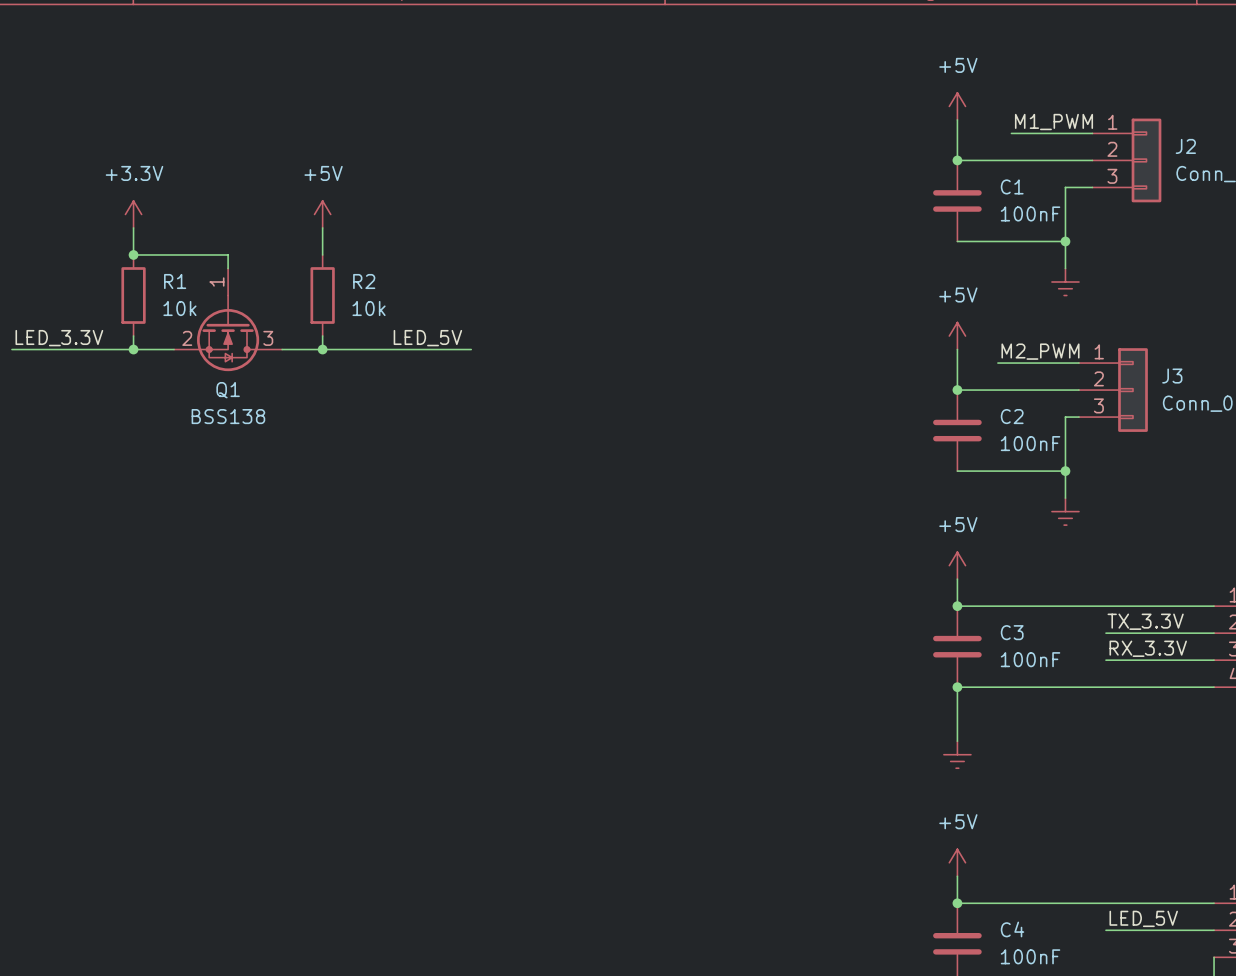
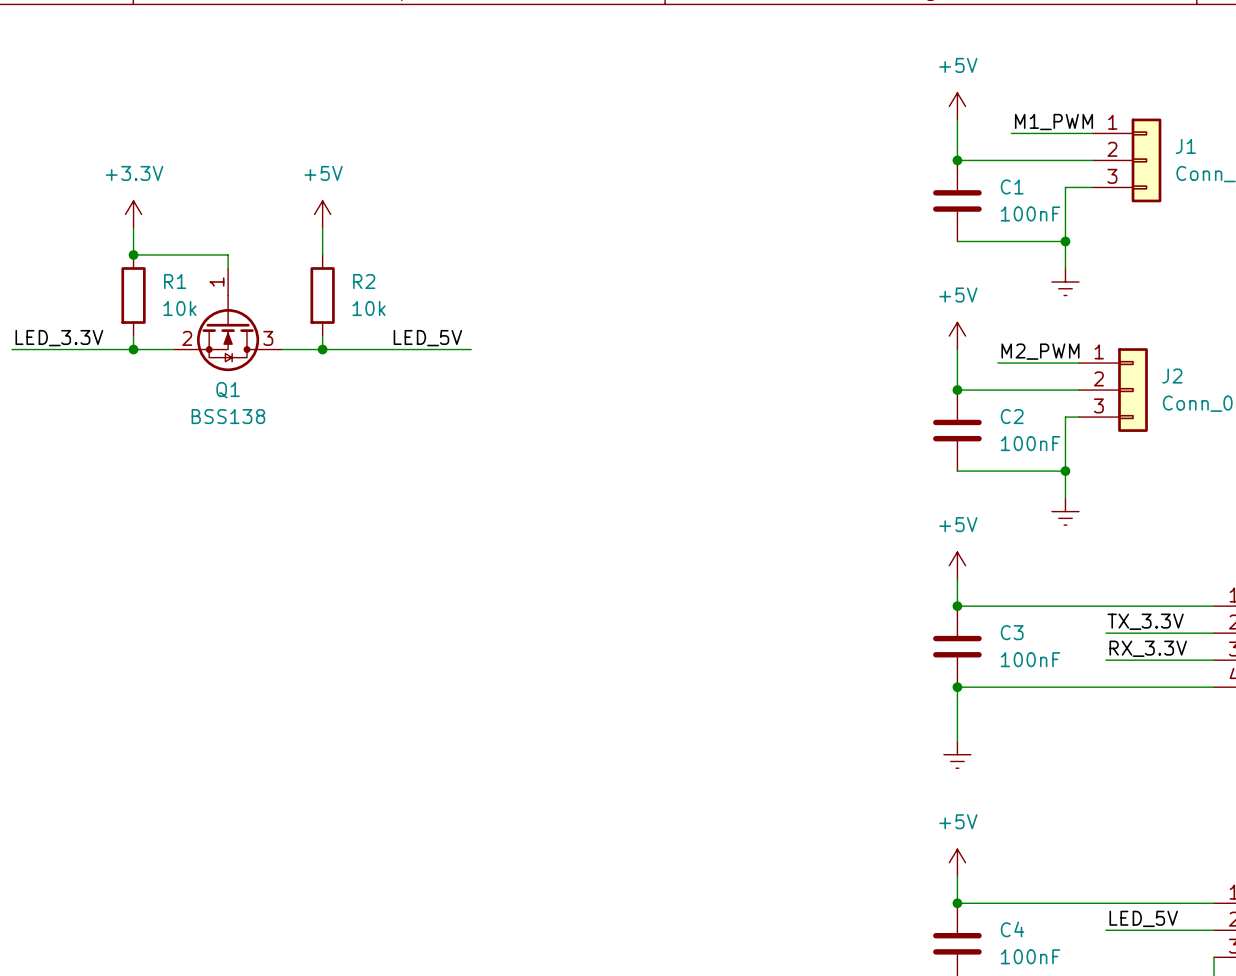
J2 name: J2 (1185, 146) -> J1 (1185, 146)
J3 name: J3 (1172, 376) -> J2 (1172, 376)

